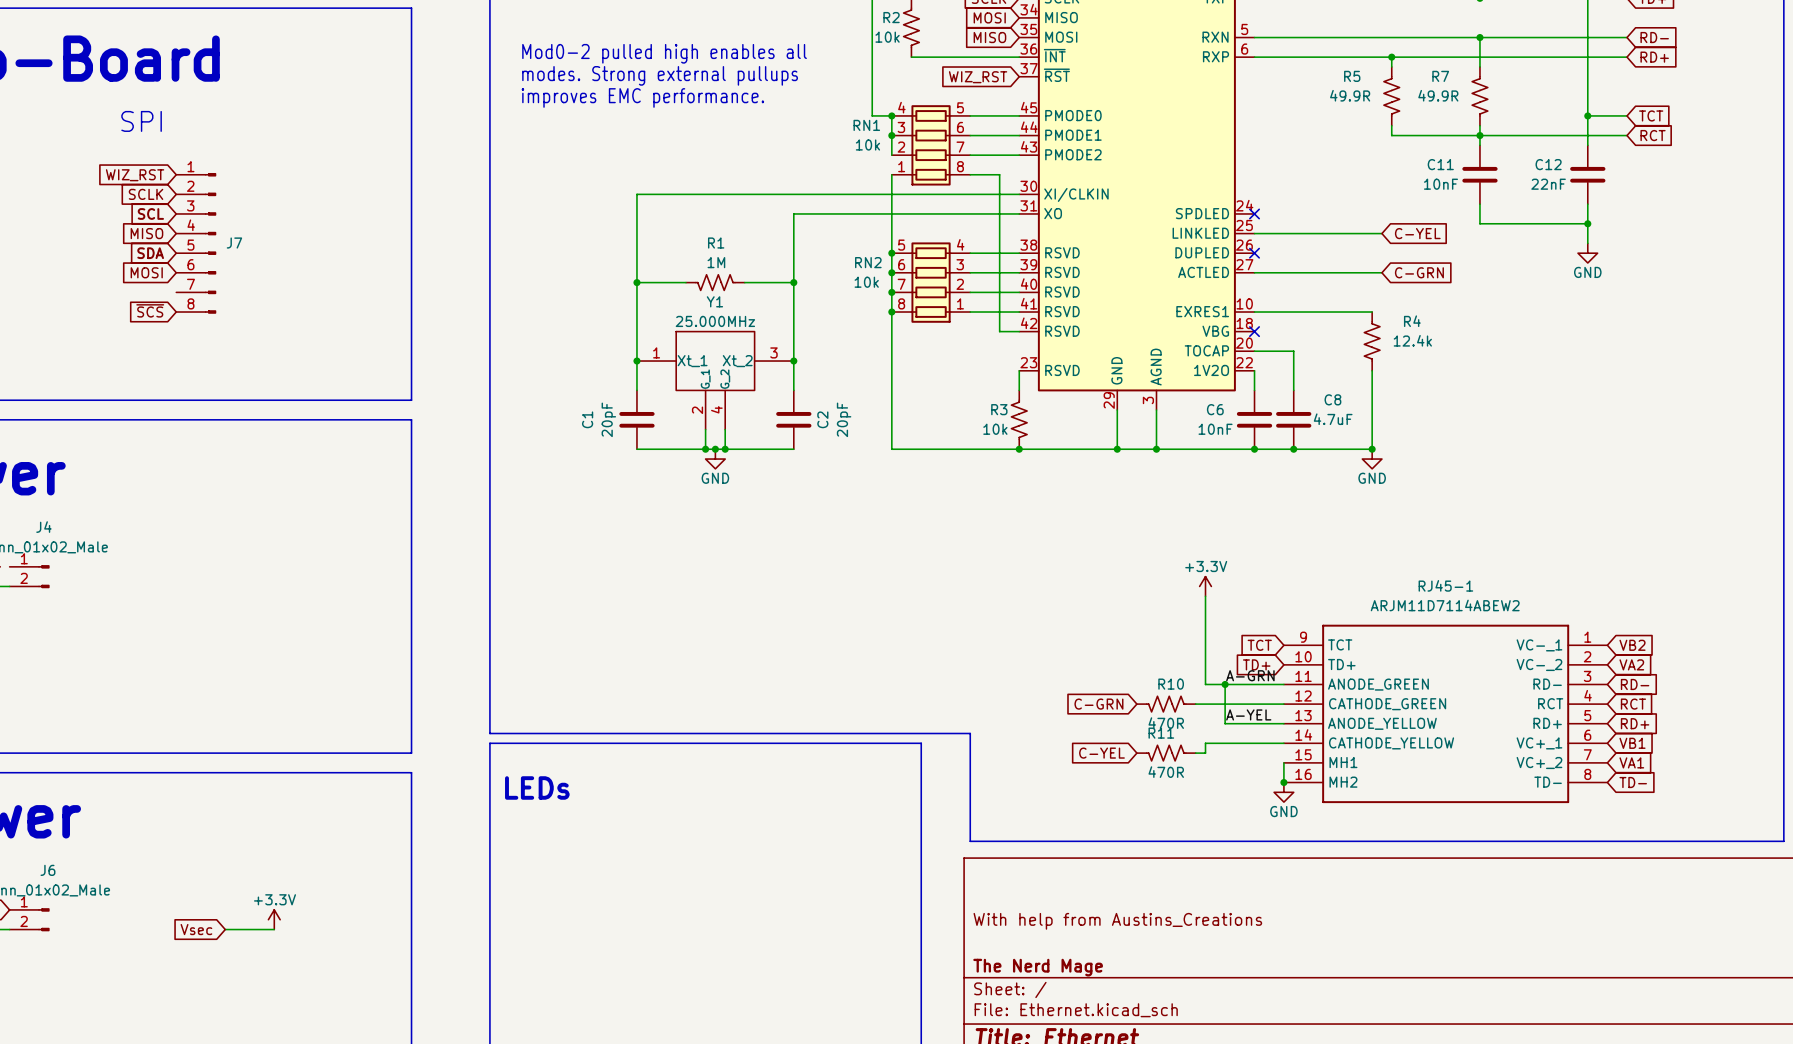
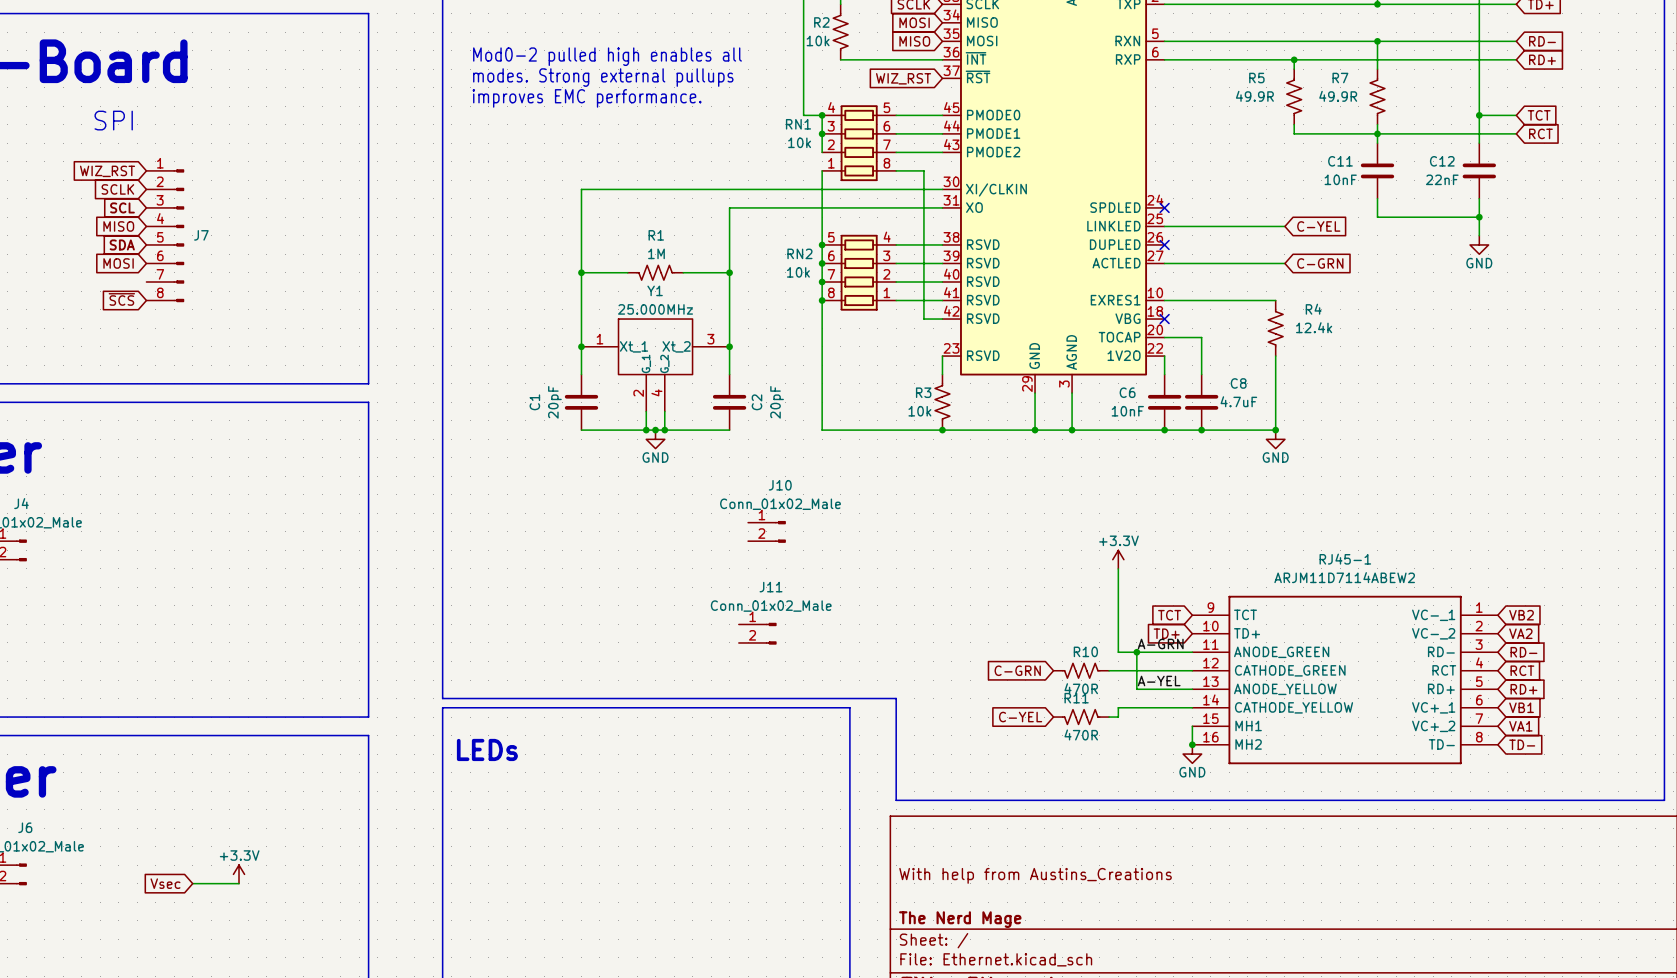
J10: none -> Conn_01x02_Male (766, 531)
J11: none -> Conn_01x02_Male (757, 633)

